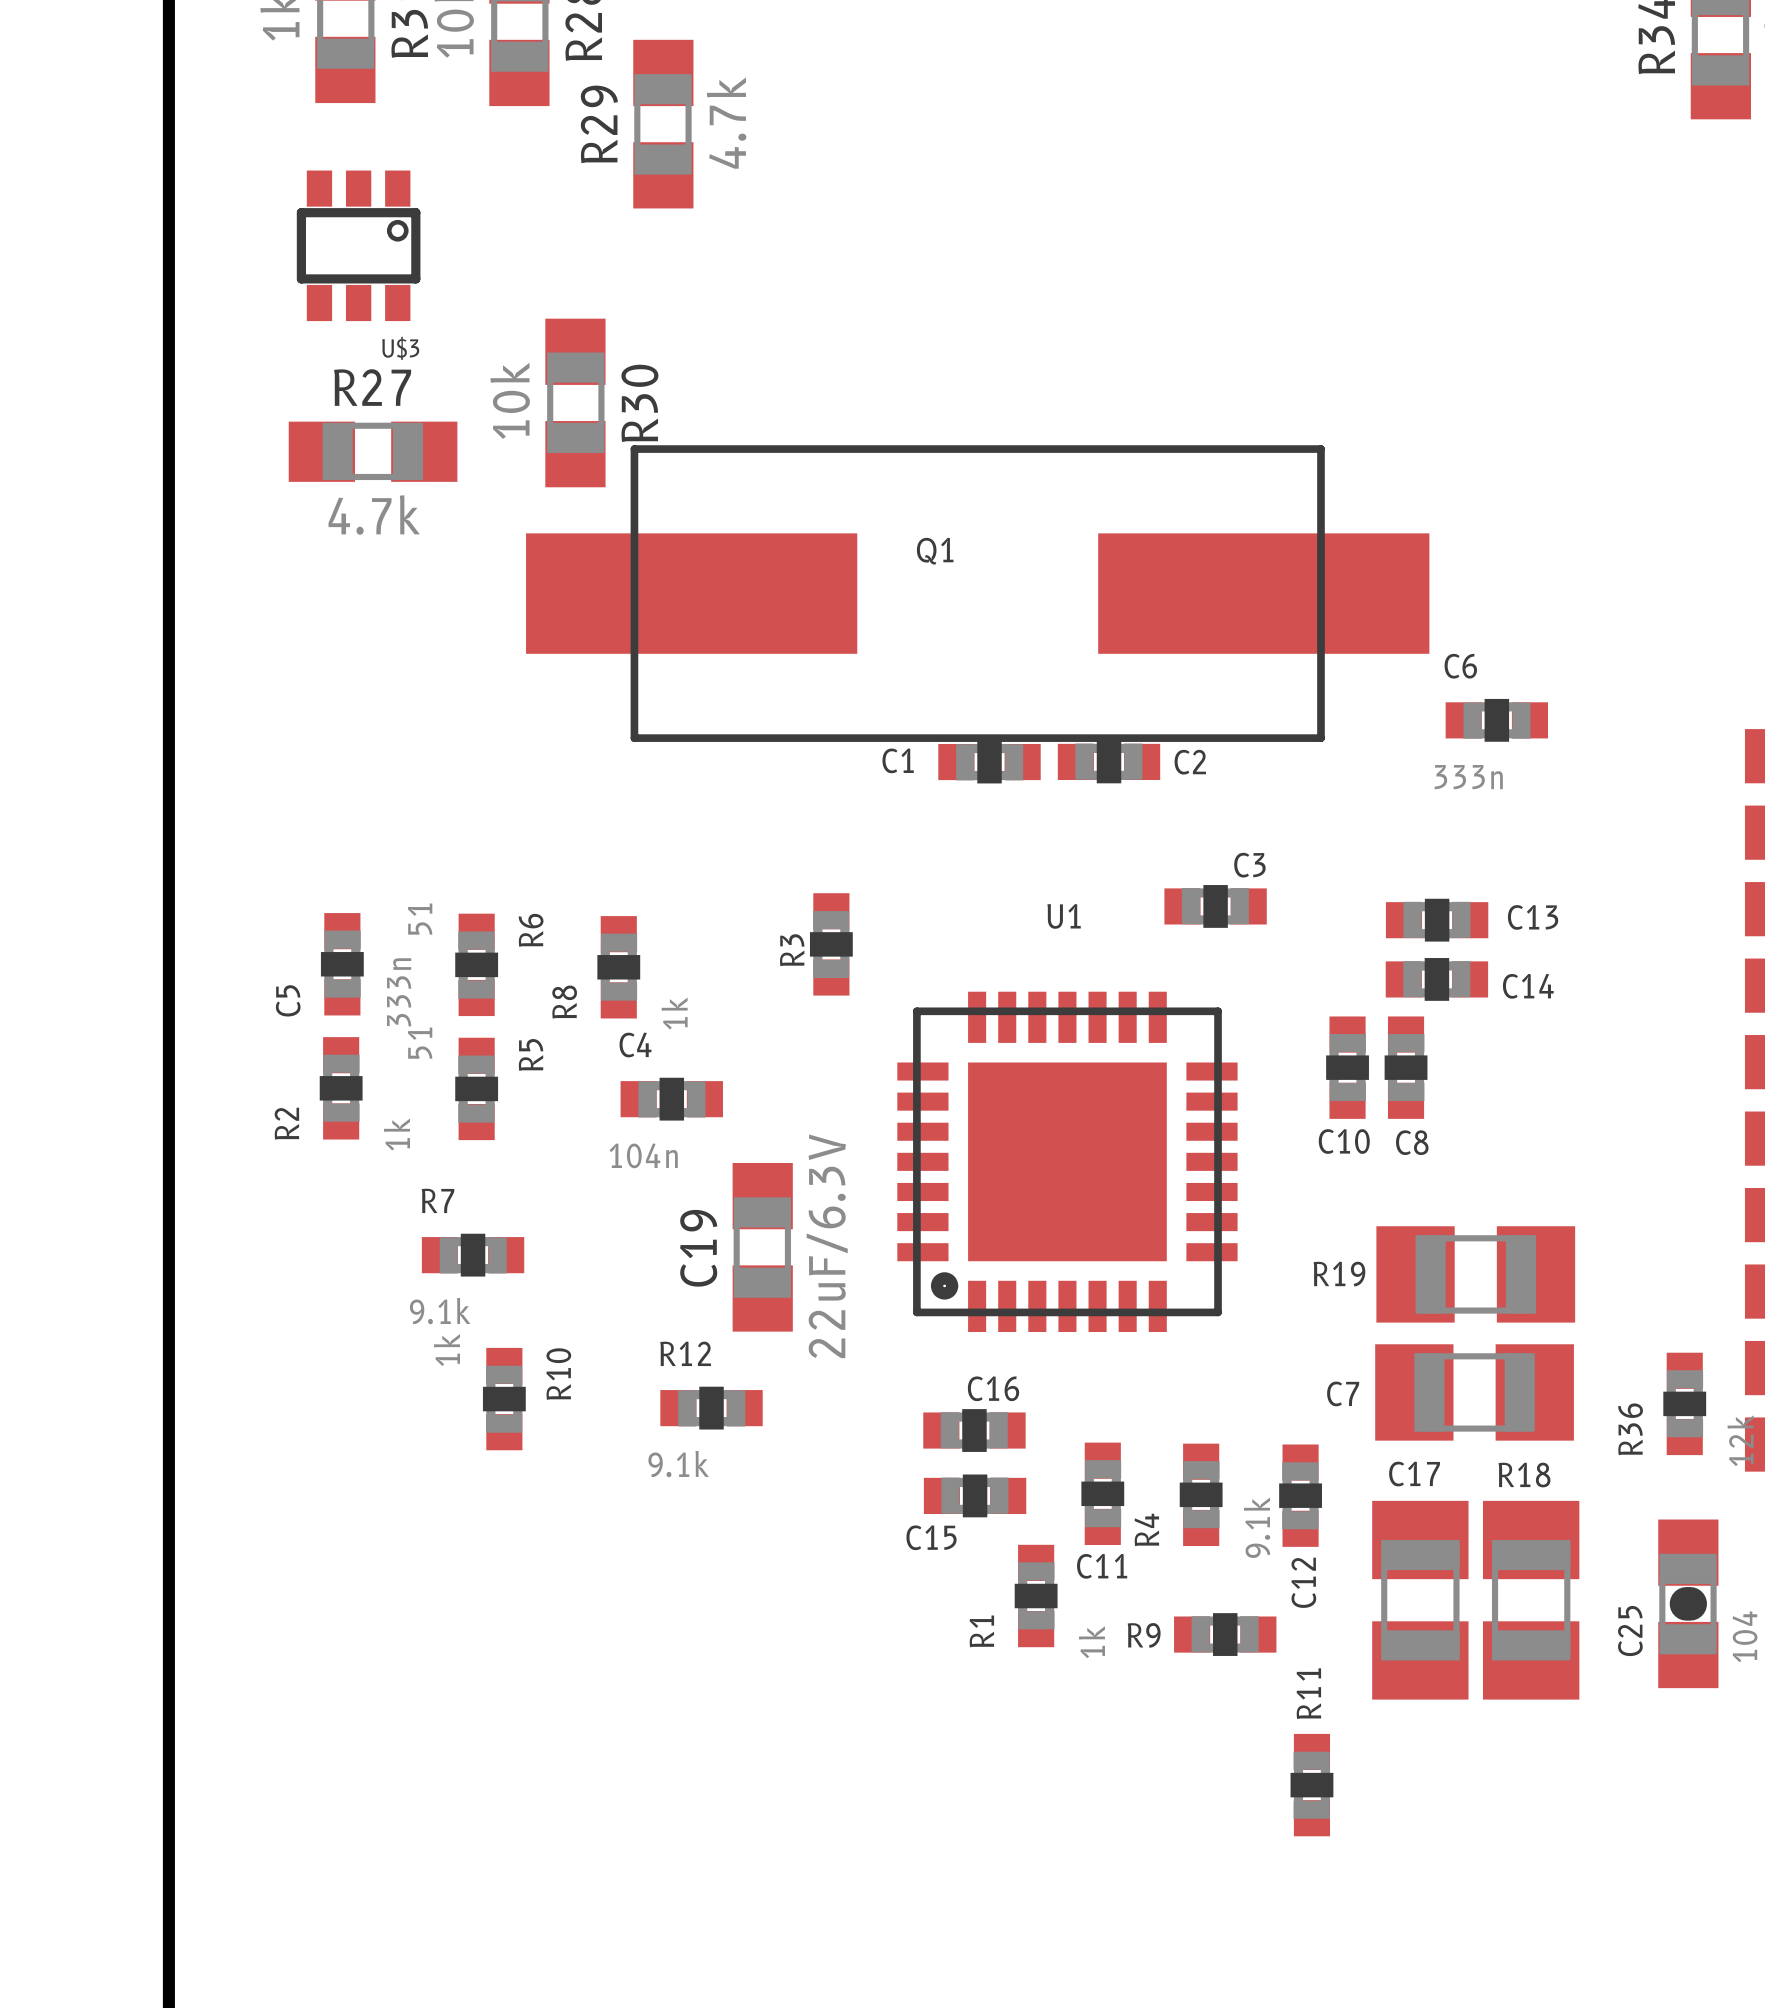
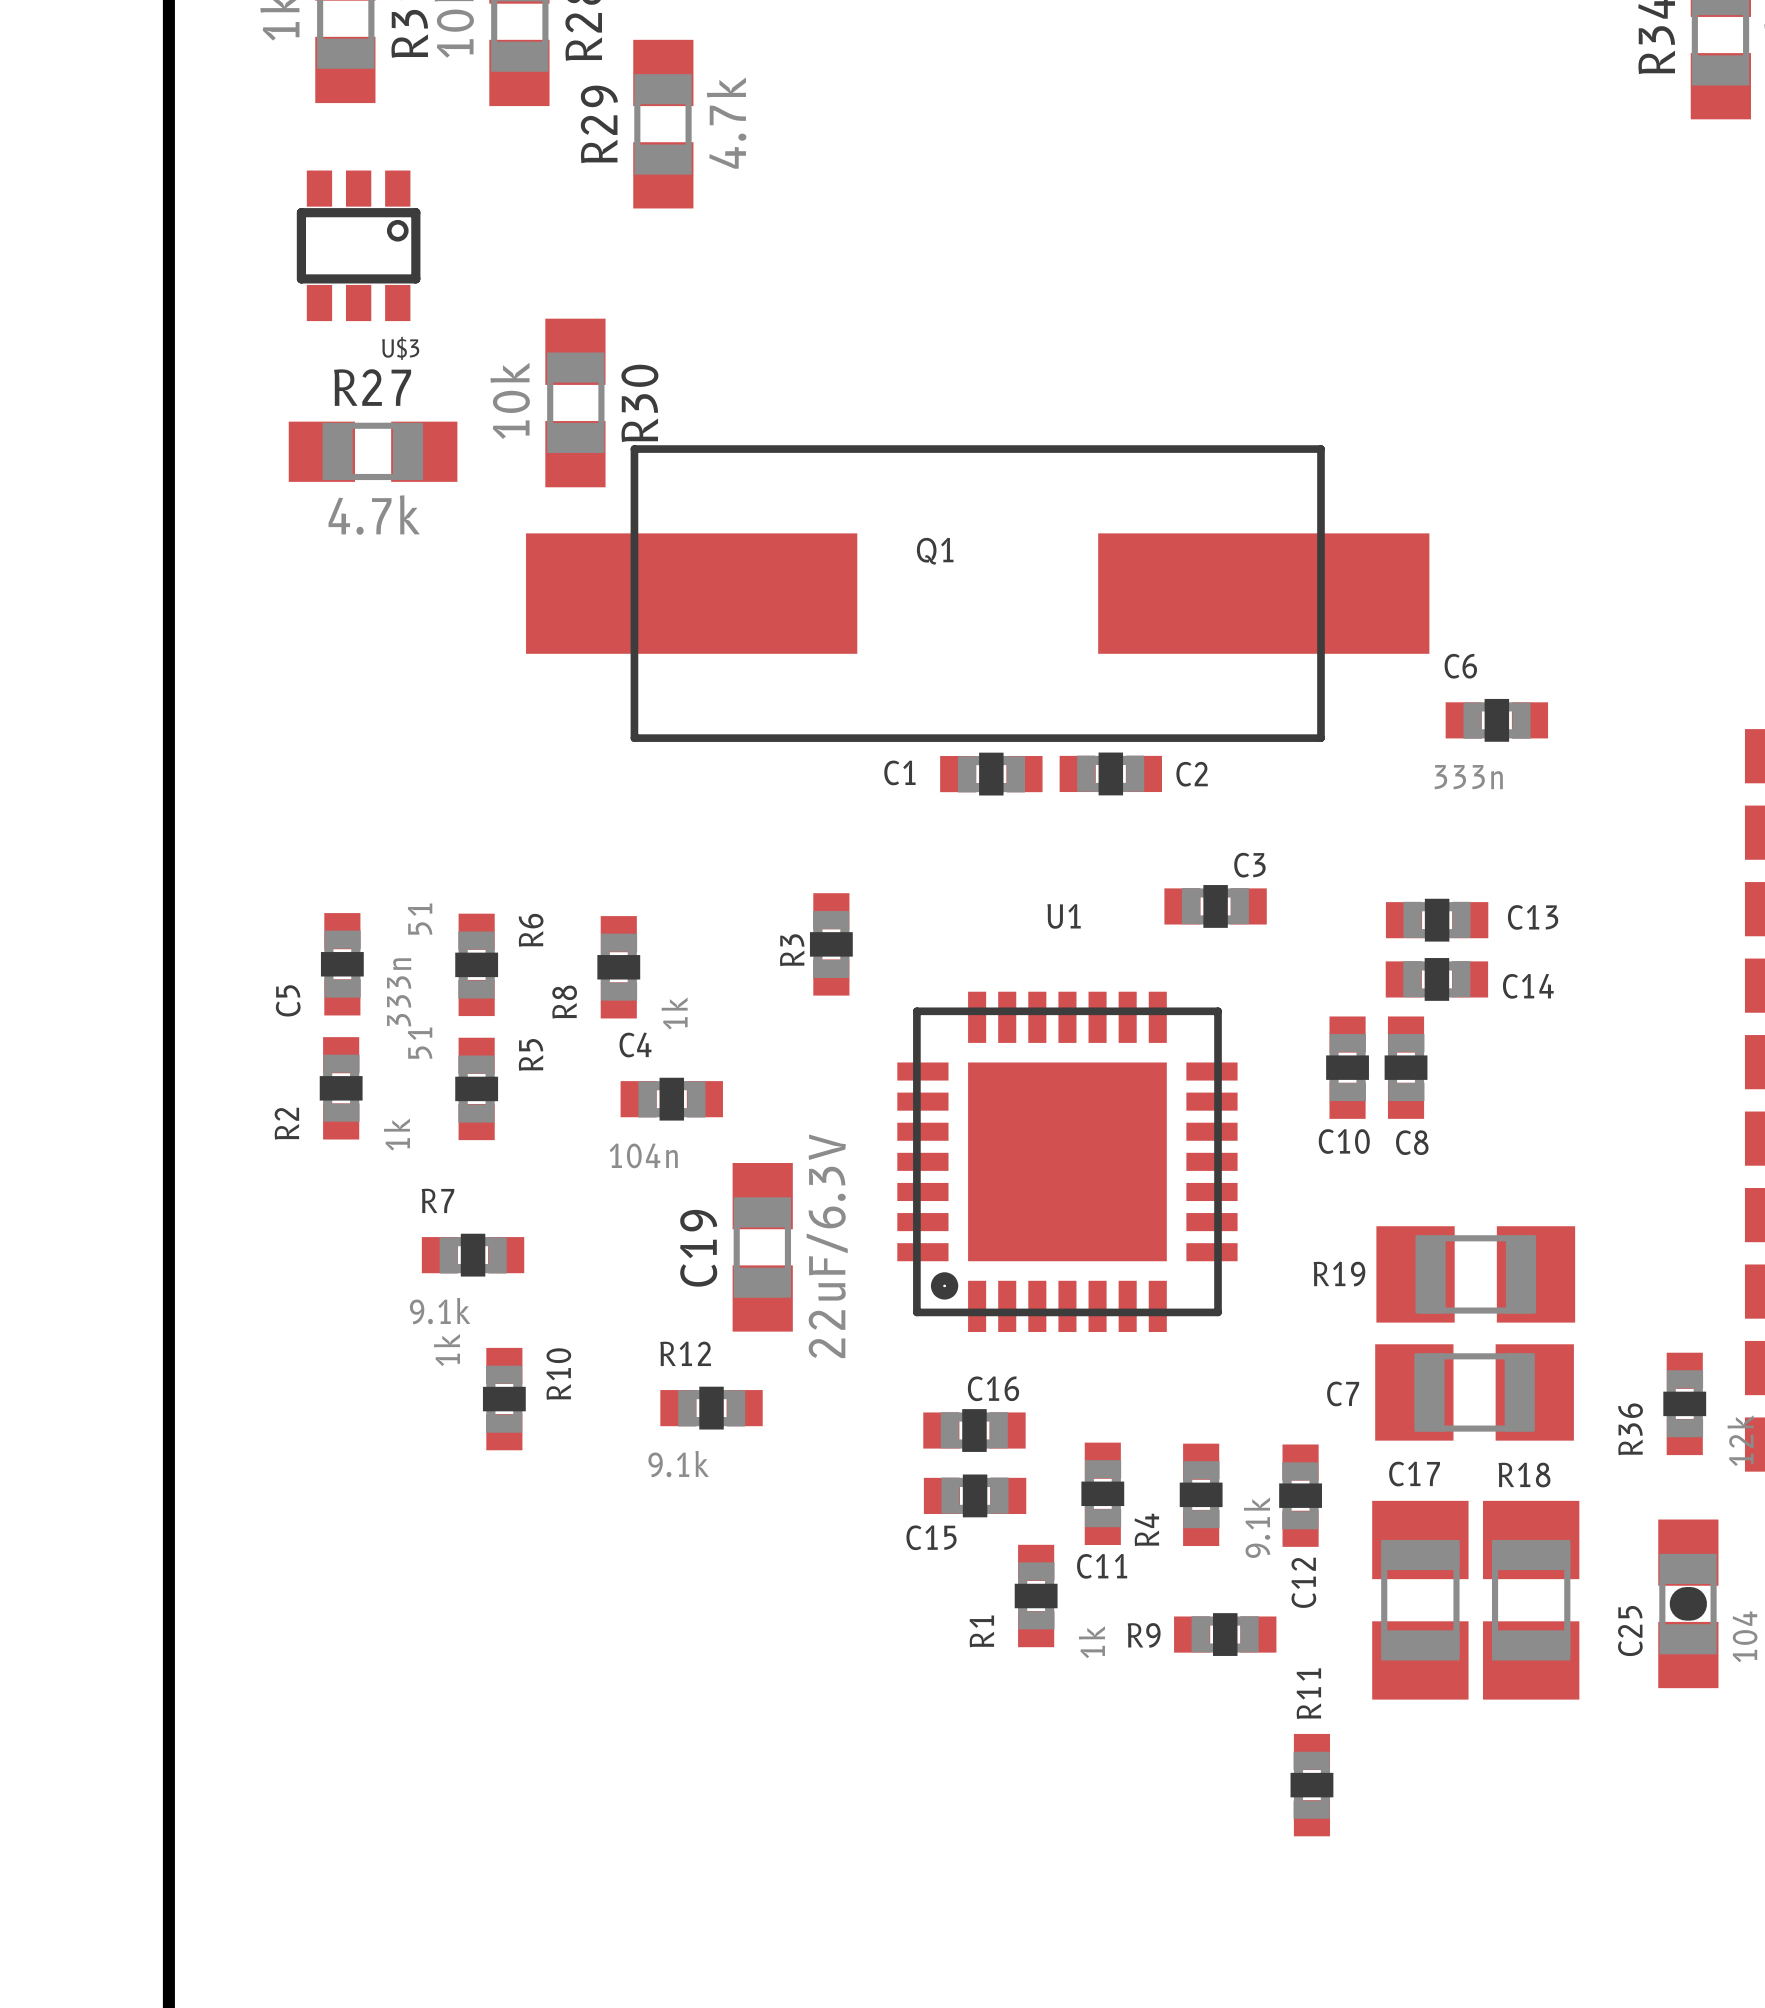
C2 position: (1109, 761) -> (1110, 773)
C1 position: (989, 762) -> (991, 774)

